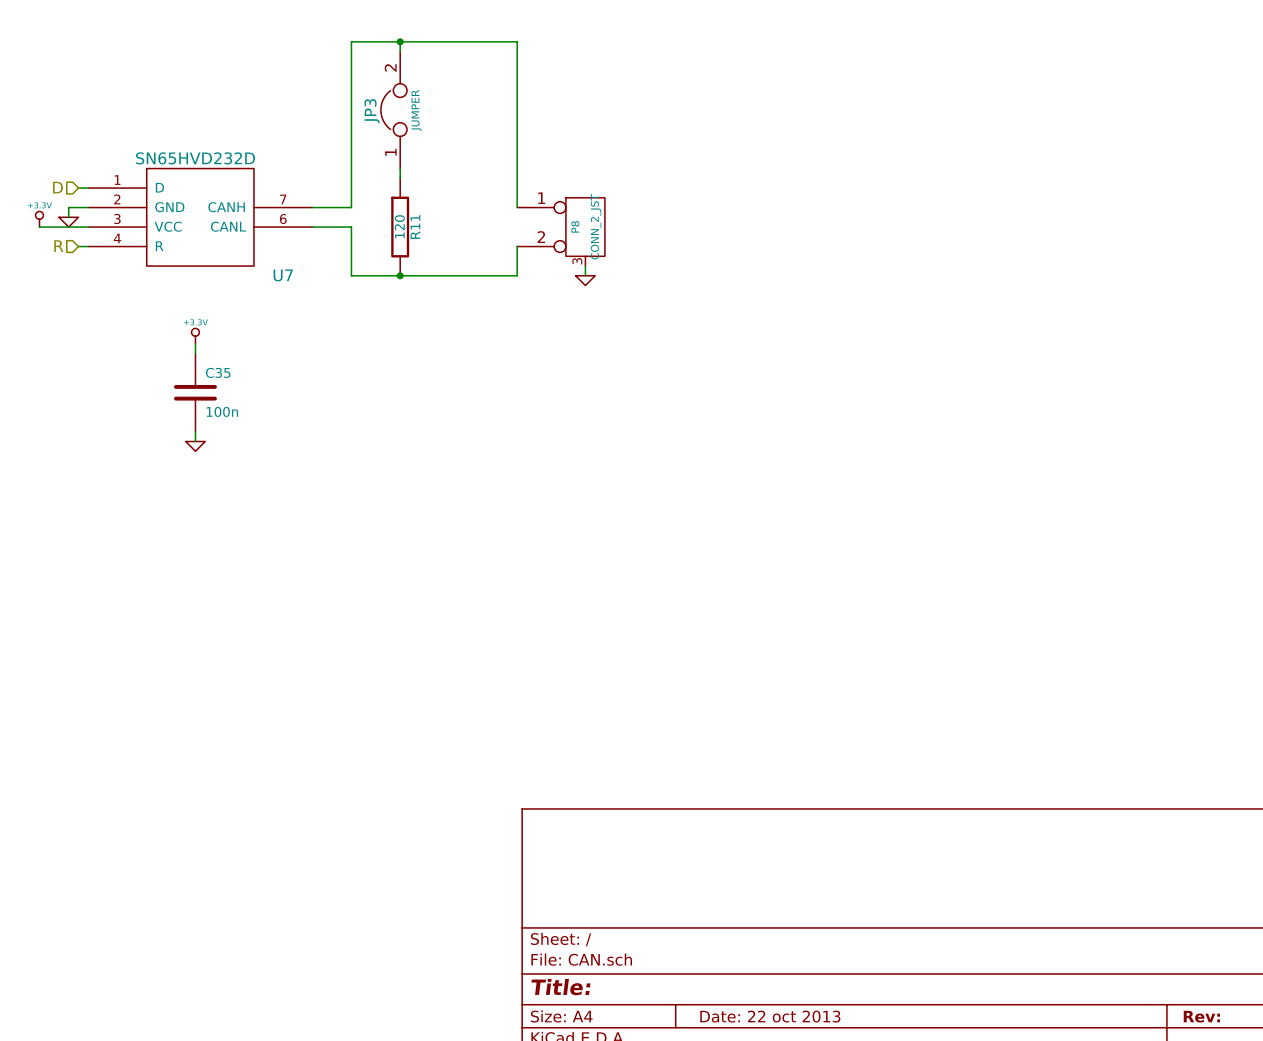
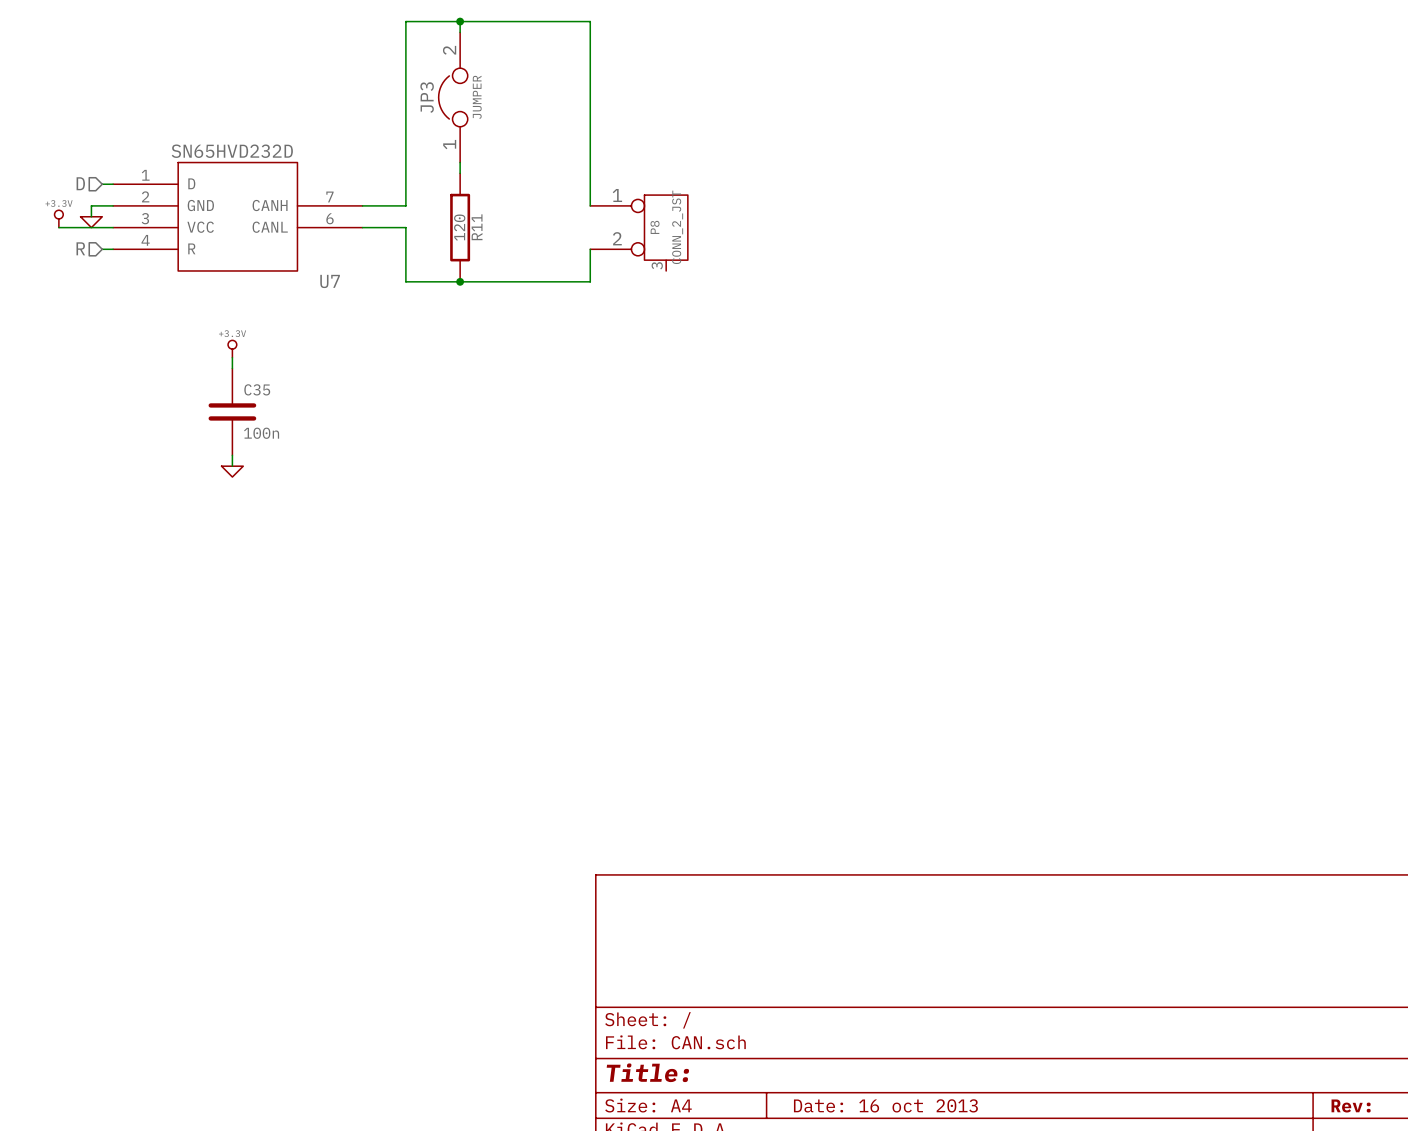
wire: (585, 266) (585, 275) -> none
power symbol: (585, 280) -> none
title block: Date: 22 oct 2013 (770, 1016) -> Date: 16 oct 2013 (885, 1105)

